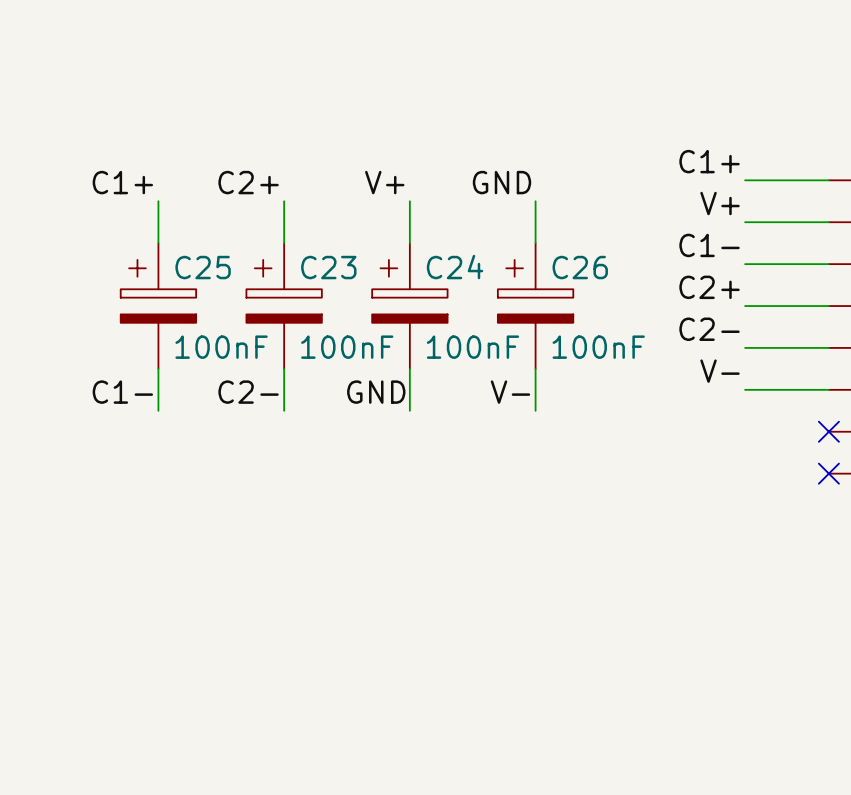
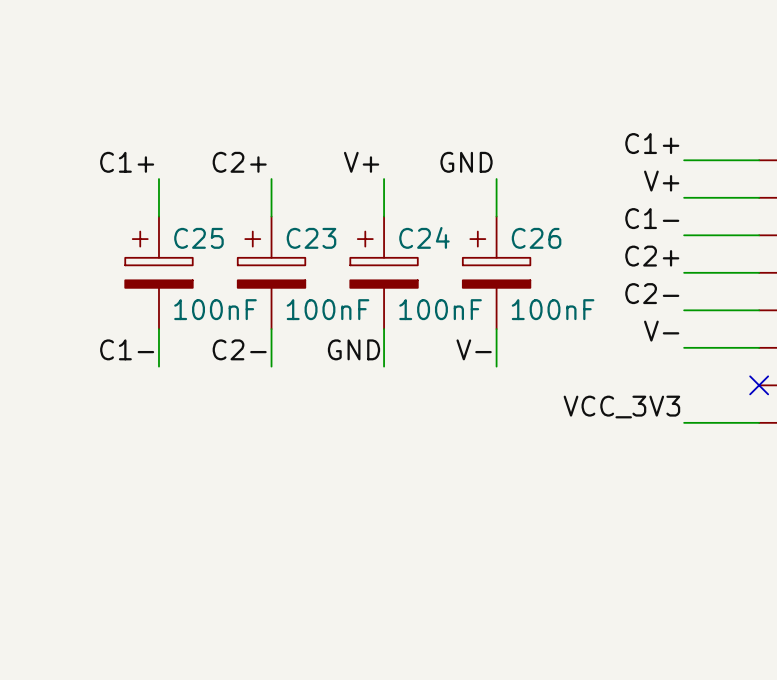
label: none -> VCC_3V3 (621, 407)
wire: none -> (684, 422) (759, 422)
no-connect mark: (828, 473) -> none

